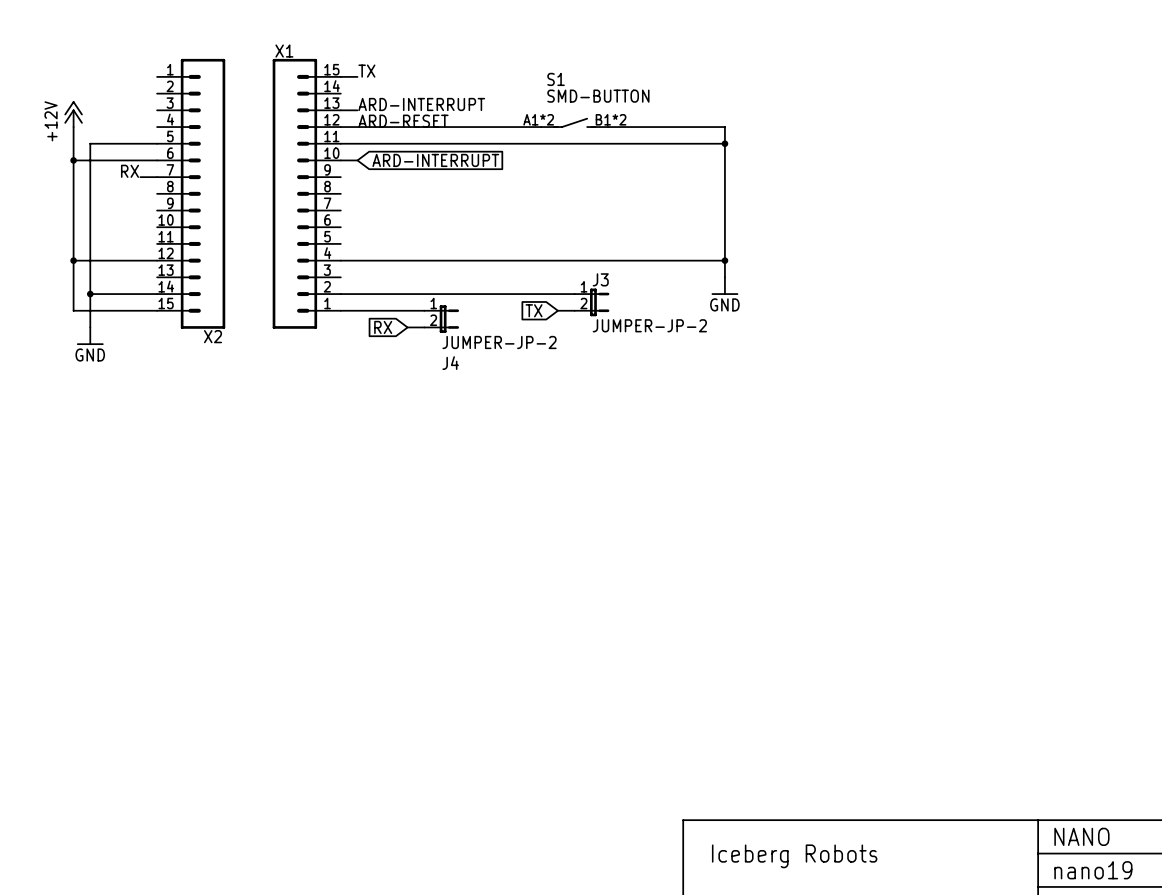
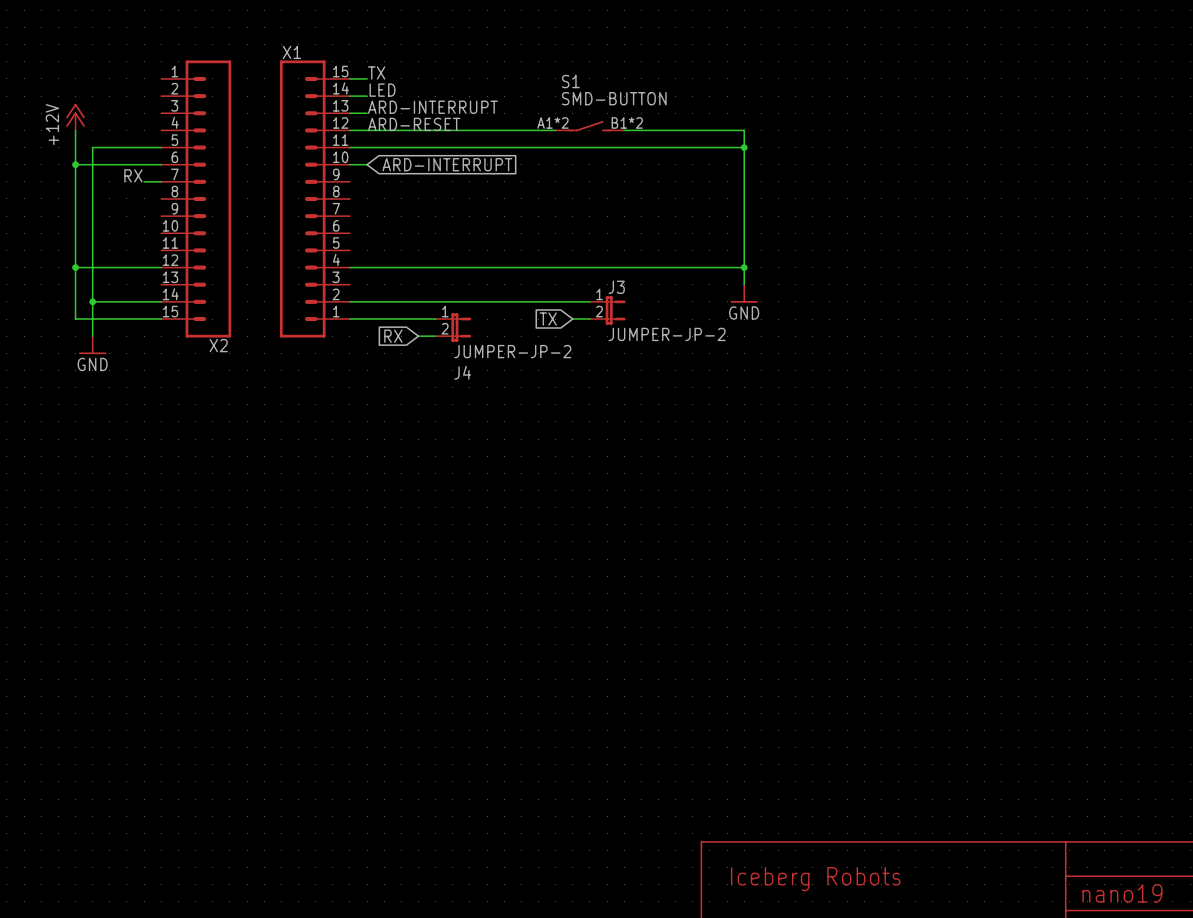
label: none -> LED (382, 90)
wire: none -> (349, 96) (367, 96)
text: NANO (1081, 836) -> none

